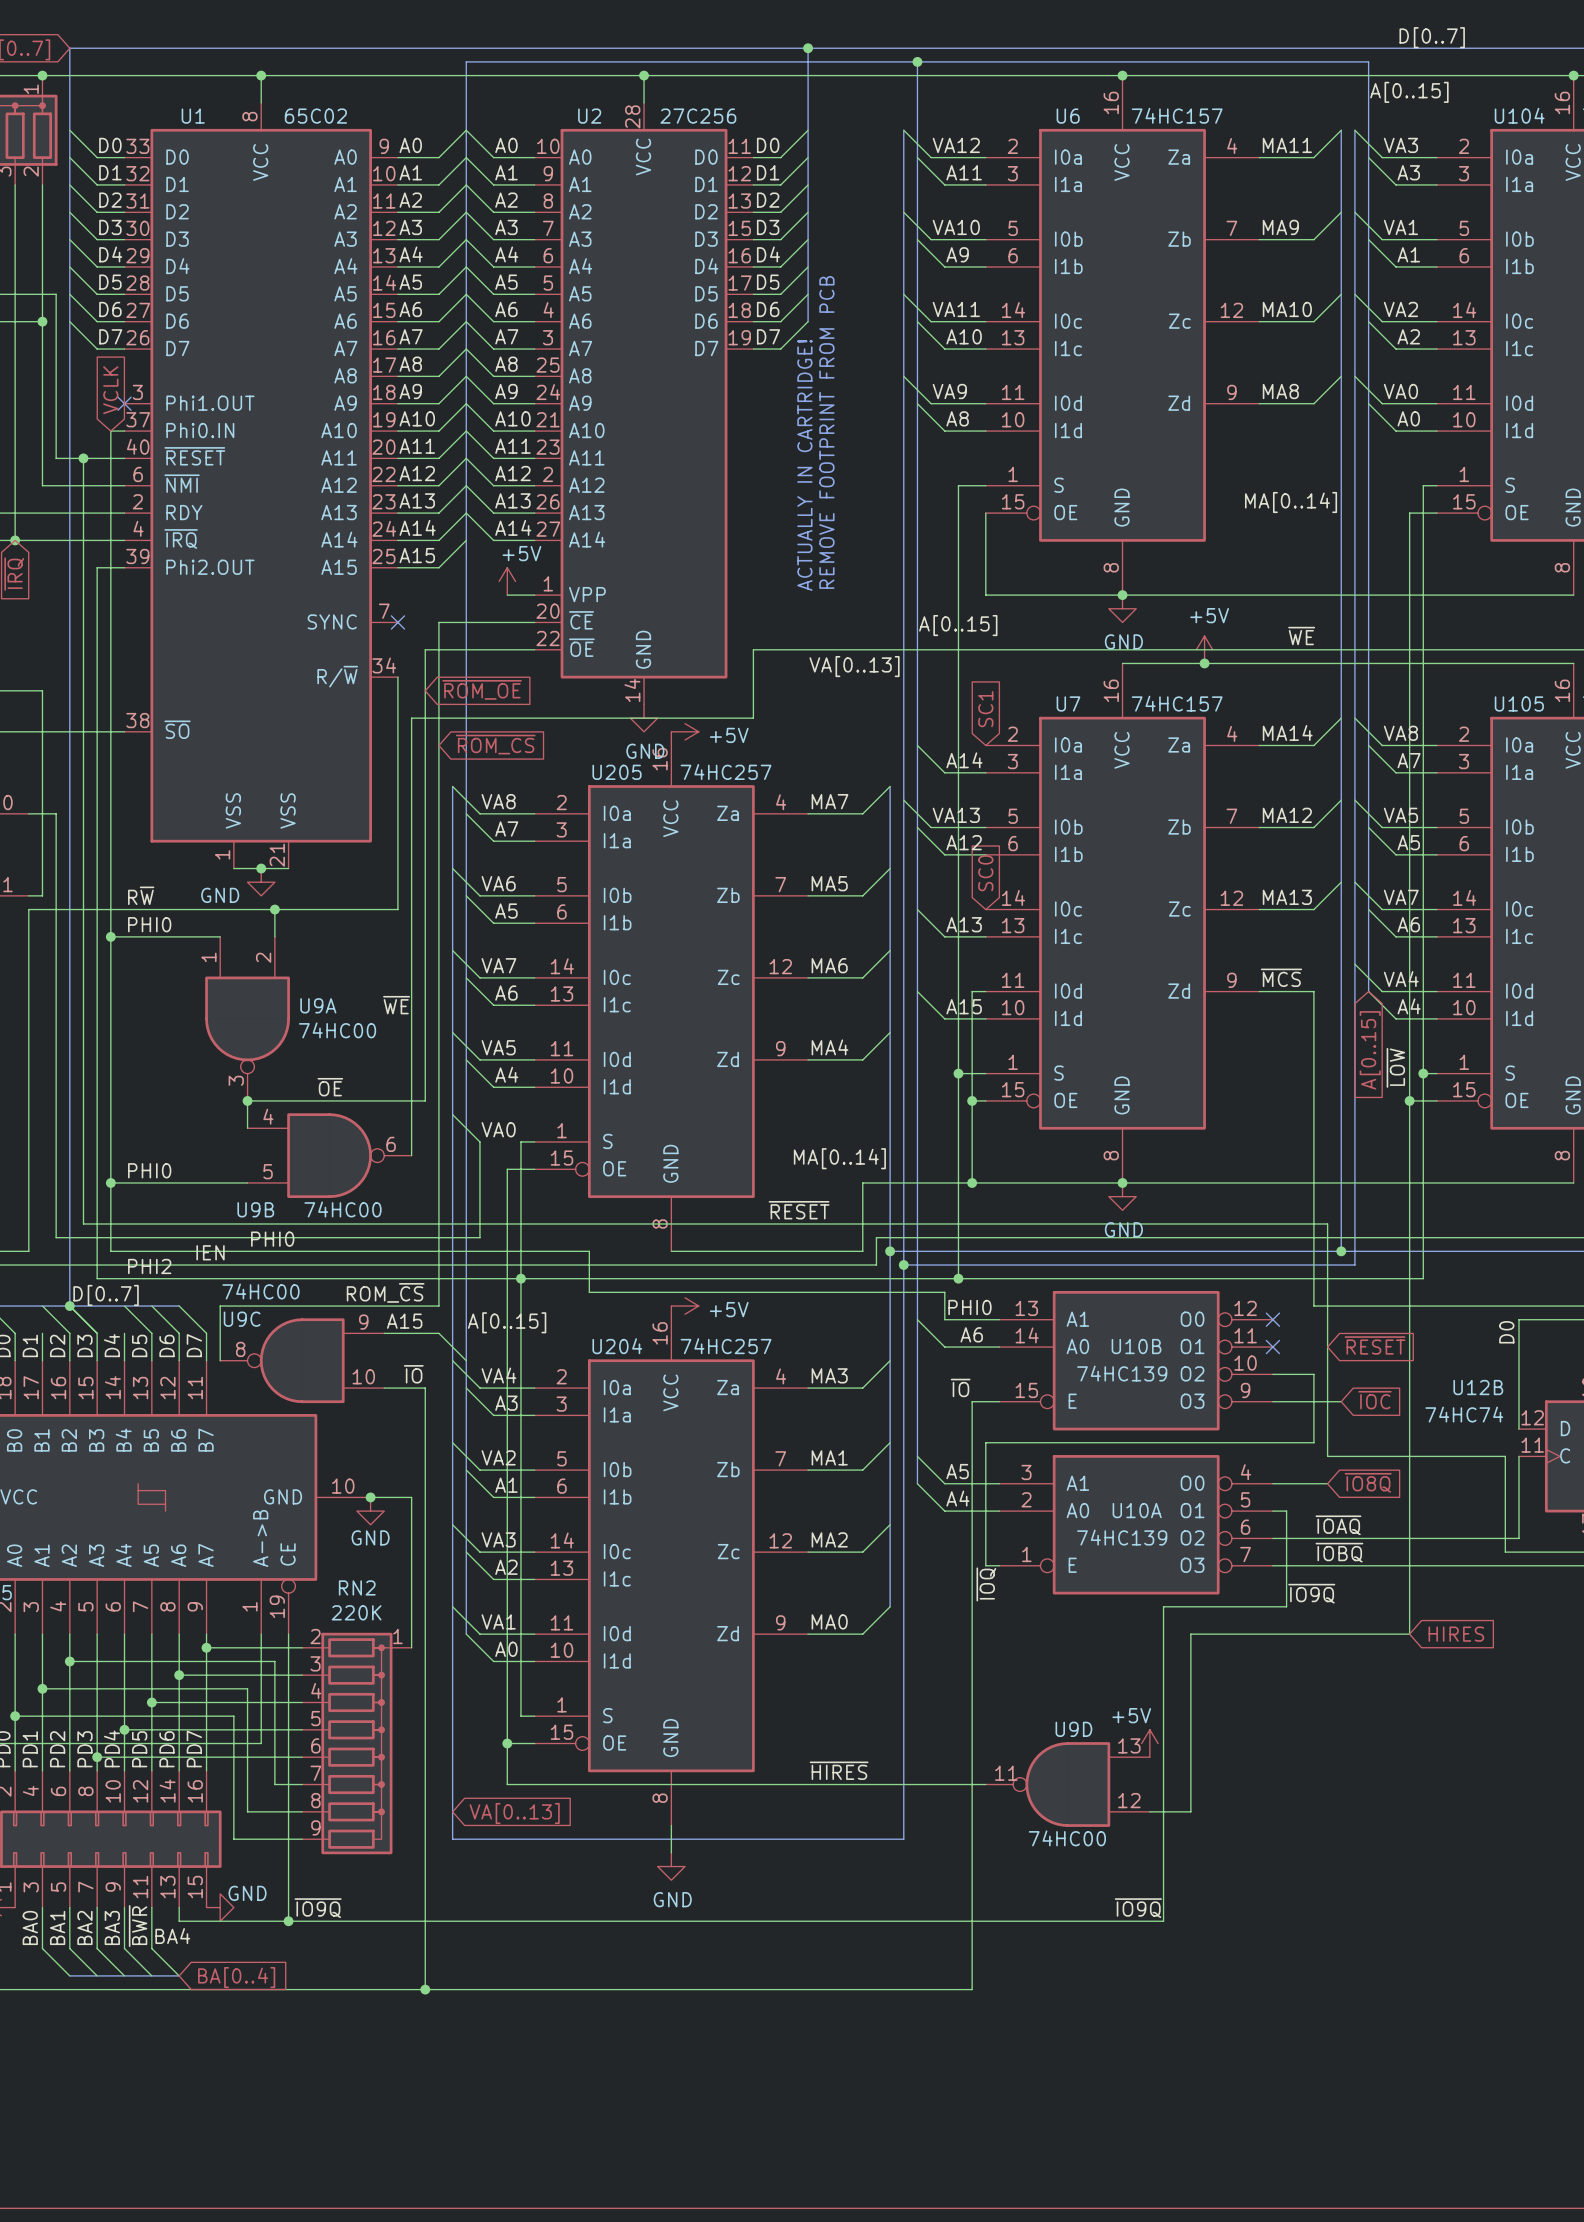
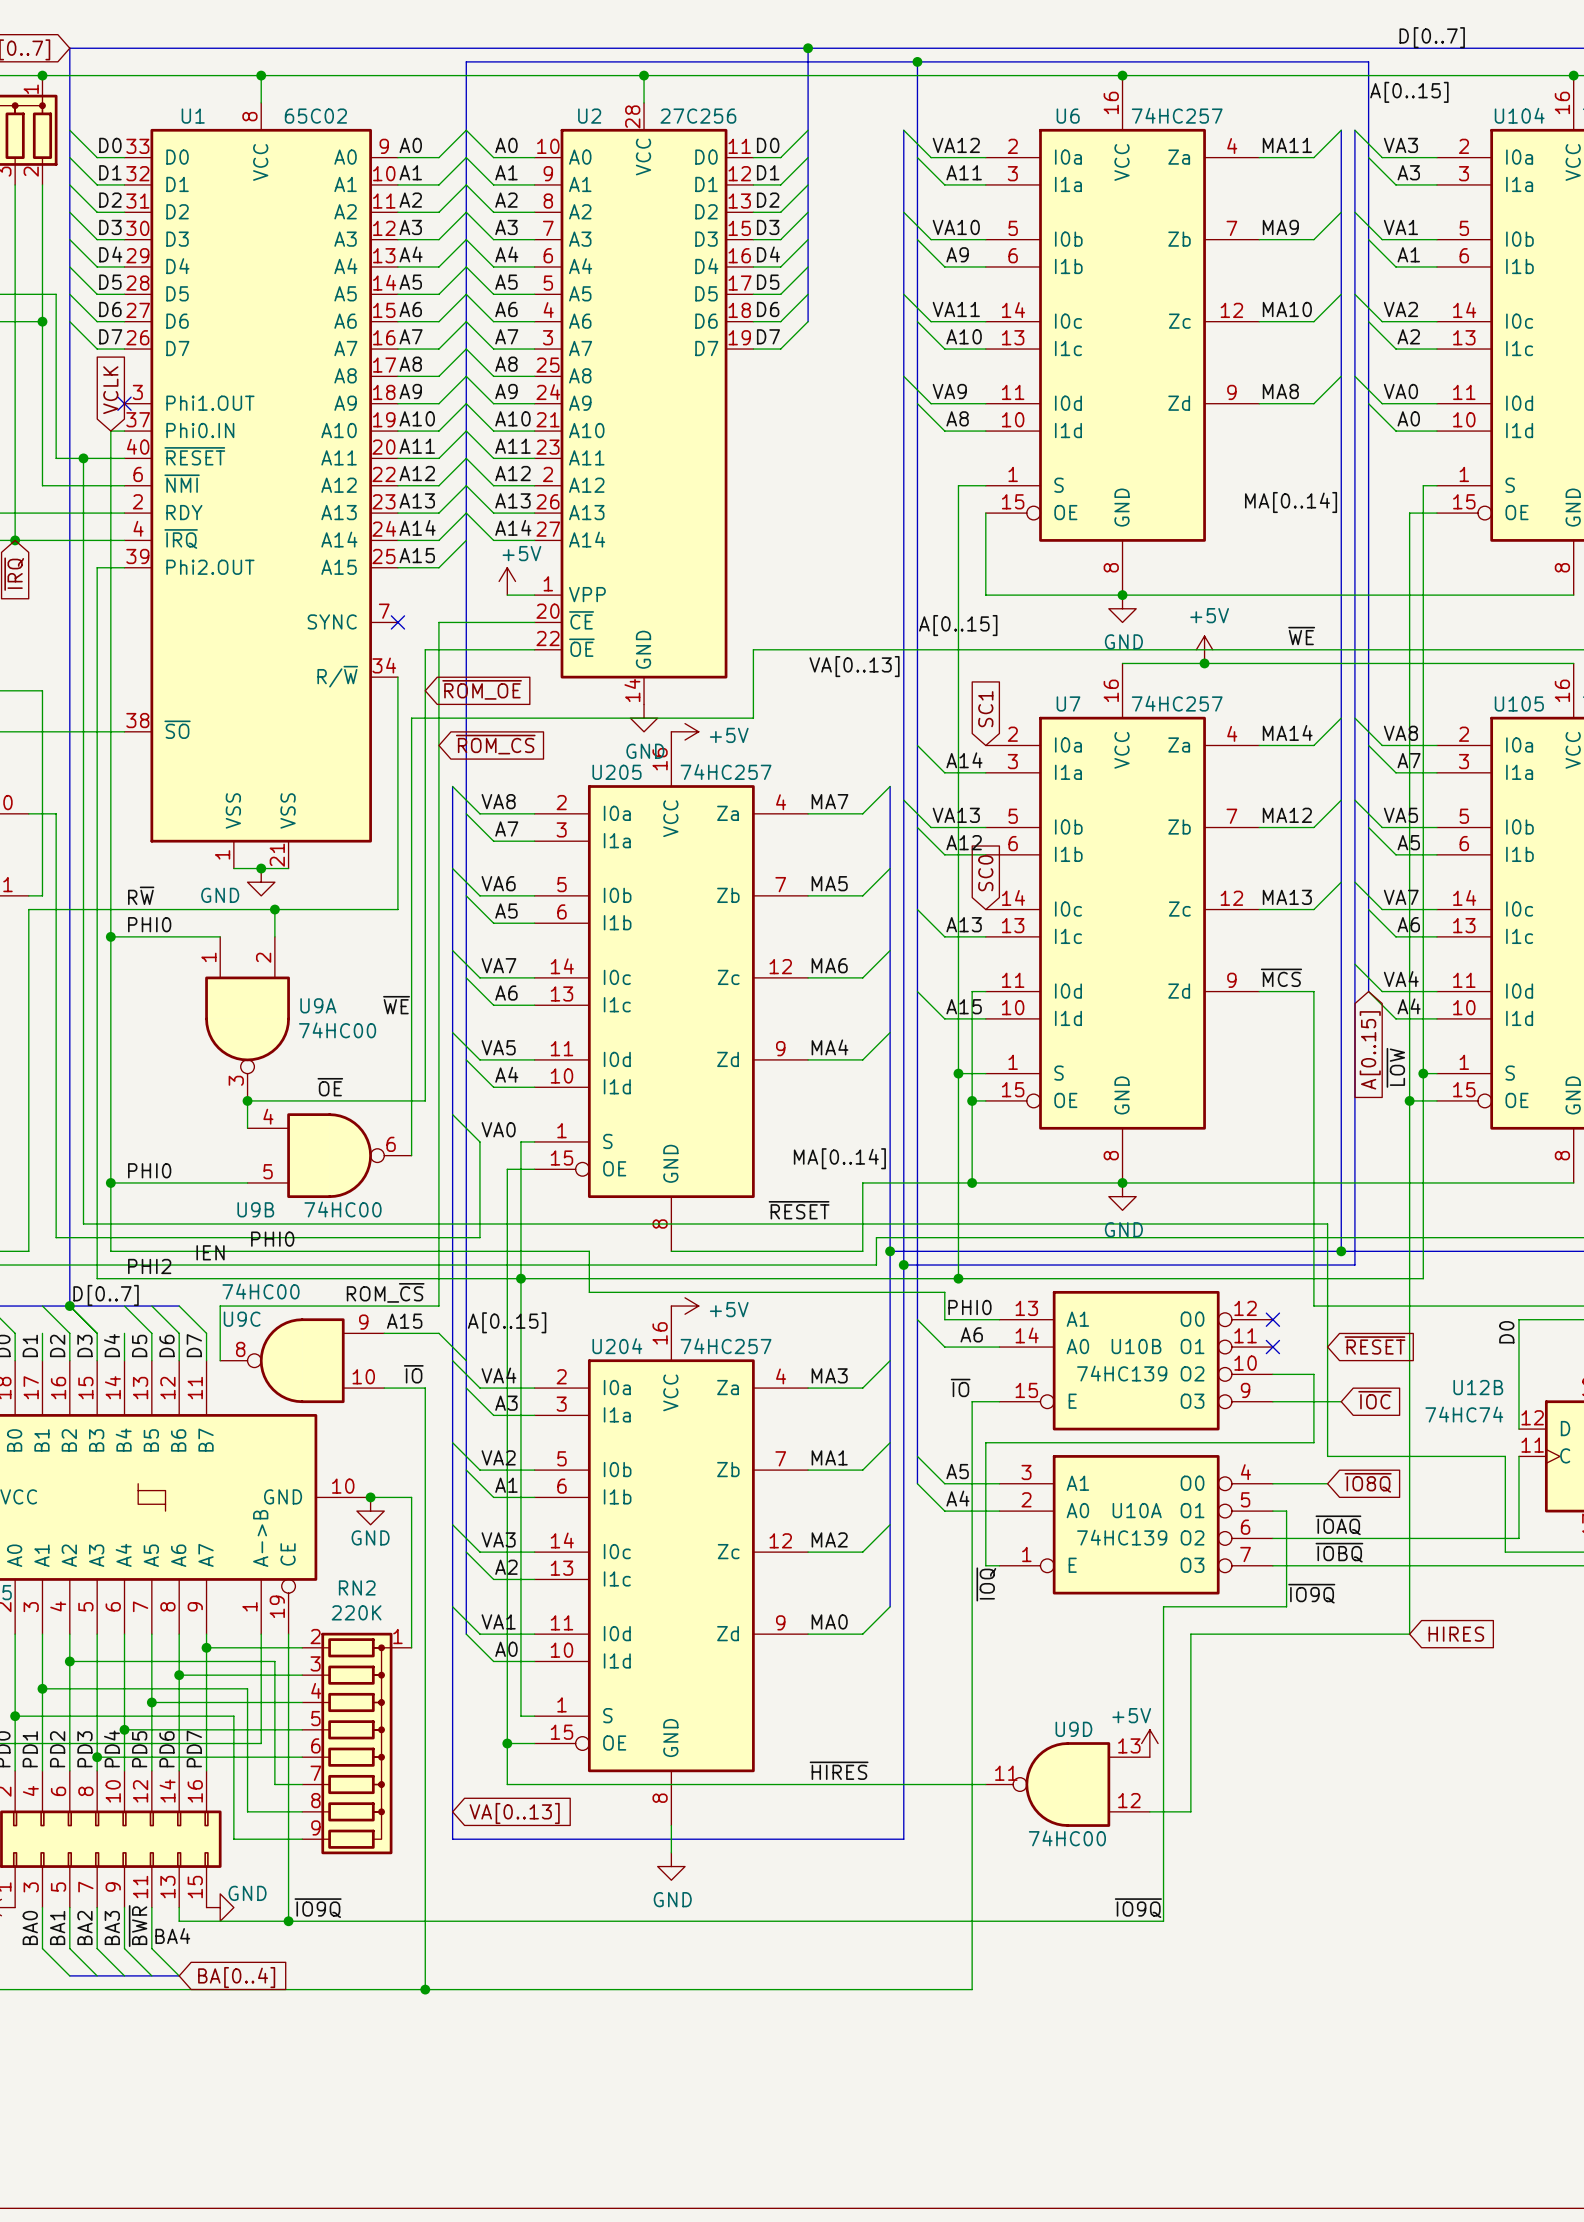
U6 value: 74HC157 (1177, 115) -> 74HC257 (1177, 115)
text: REMOVE FOOTPRINT FROM PCB (826, 432) -> none
text: ACTUALLY IN CARTRIDGE! (804, 465) -> none
U7 value: 74HC157 (1177, 703) -> 74HC257 (1177, 703)

